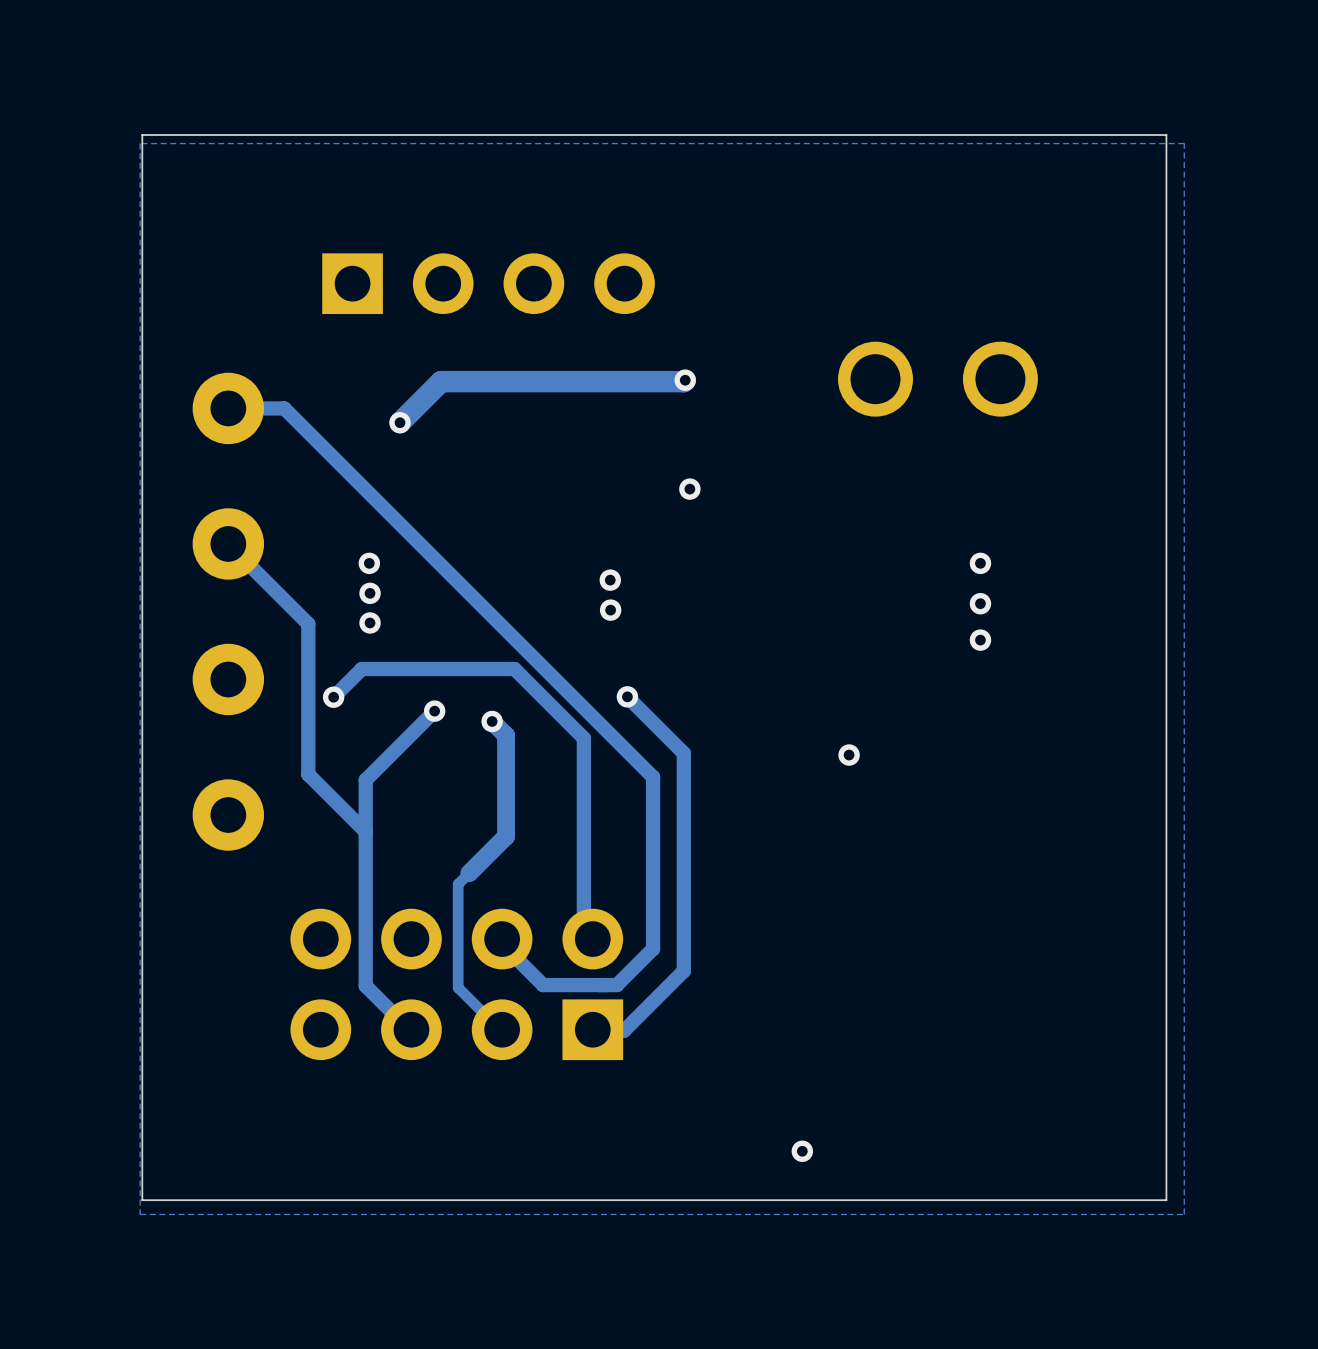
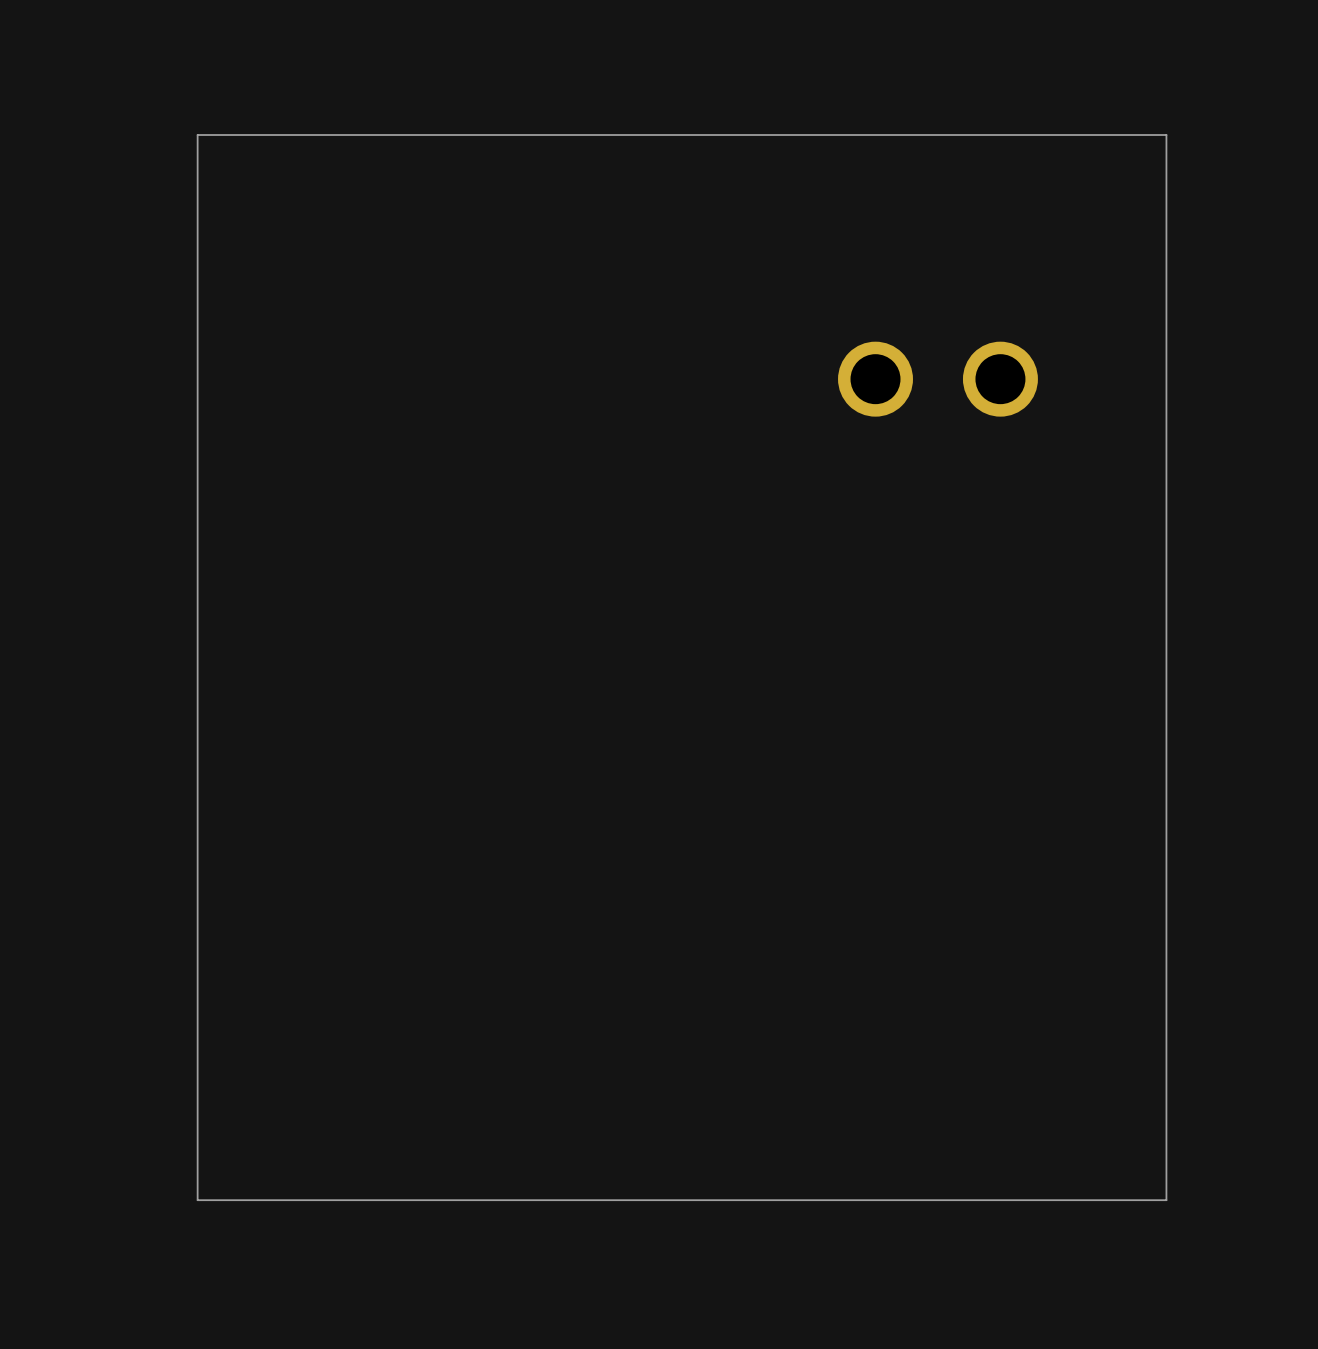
board edge: (197, 135) (142, 135) (142, 1200) (197, 1200) -> (197, 135) (197, 1200)
zone outline: (1184, 143) (140, 143) (140, 1214) (1184, 1214) (1184, 143) -> none
part: (488, 283) -> none
track: (685, 380) (441, 381) (400, 422) -> none
via: (685, 380) -> none
track: (228, 408) (284, 408) (653, 777) (653, 948) (616, 985) (543, 985) (497, 939) -> none
part: (228, 408) -> none
via: (400, 422) -> none
via: (689, 489) -> none
track: (228, 543) (308, 623) (308, 774) (365, 831) -> none
part: (228, 543) -> none
via: (369, 563) -> none
via: (980, 563) -> none
via: (610, 580) -> none
via: (370, 593) -> none
via: (980, 603) -> none
via: (610, 610) -> none
via: (370, 622) -> none
via: (980, 640) -> none
part: (228, 679) -> none
track: (627, 696) (683, 753) (683, 971) (624, 1030) (591, 1030) -> none
via: (627, 696) -> none
track: (333, 697) (361, 669) (514, 669) (583, 738) (583, 935) (587, 939) -> none
via: (333, 697) -> none
track: (434, 711) (365, 780) (365, 985) (410, 1030) -> none
via: (434, 711) -> none
track: (492, 721) (506, 735) (506, 836) (458, 884) (458, 987) (501, 1030) -> none
via: (492, 721) -> none
via: (849, 755) -> none
part: (228, 815) -> none
part: (456, 984) -> none
via: (802, 1151) -> none

